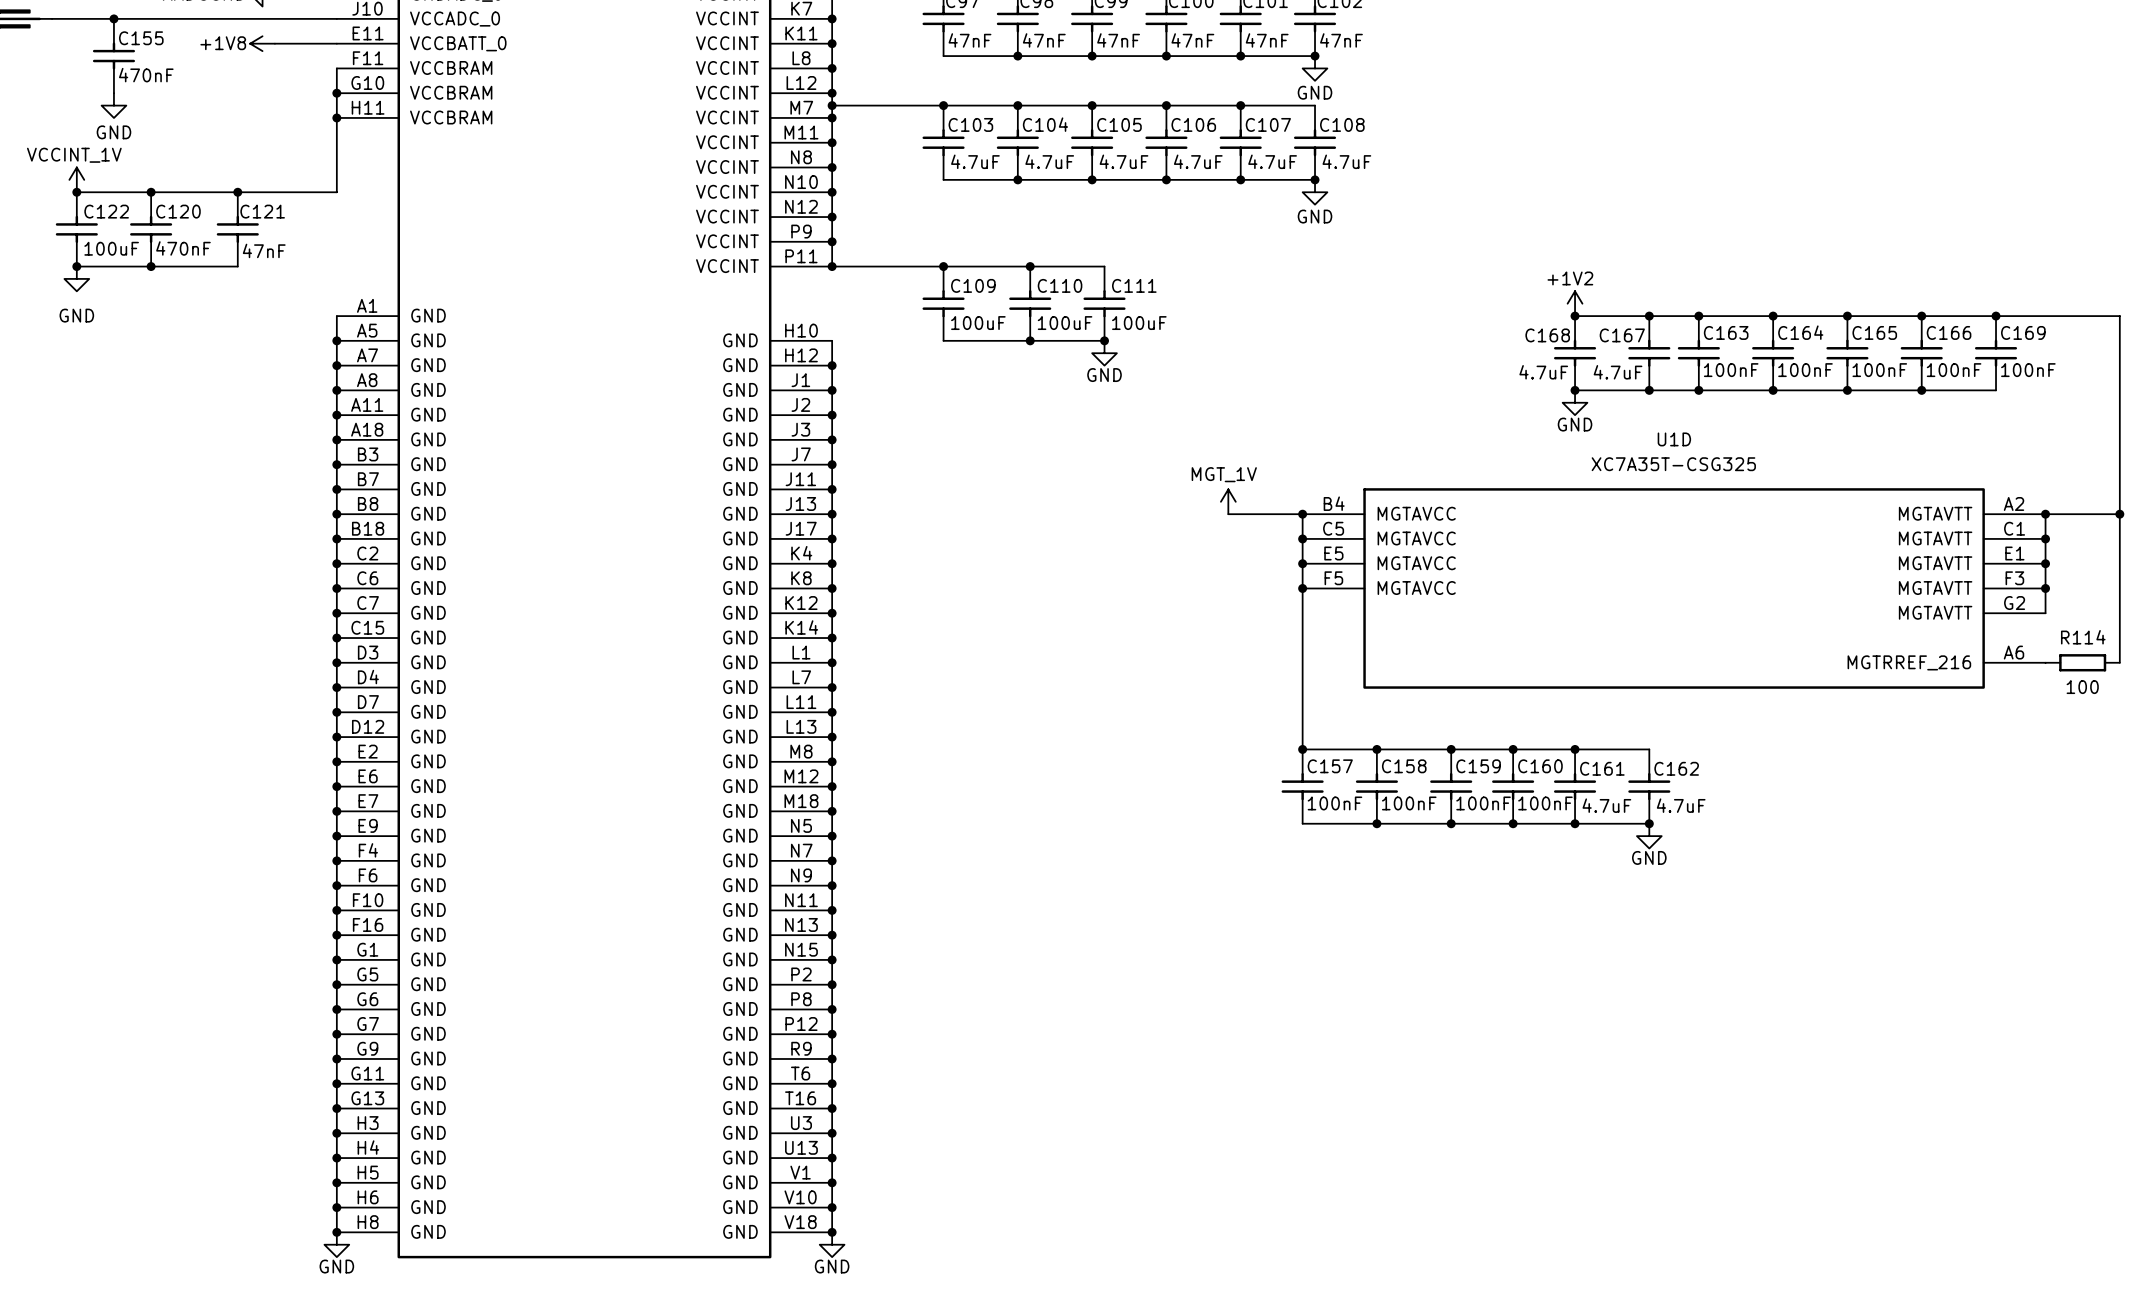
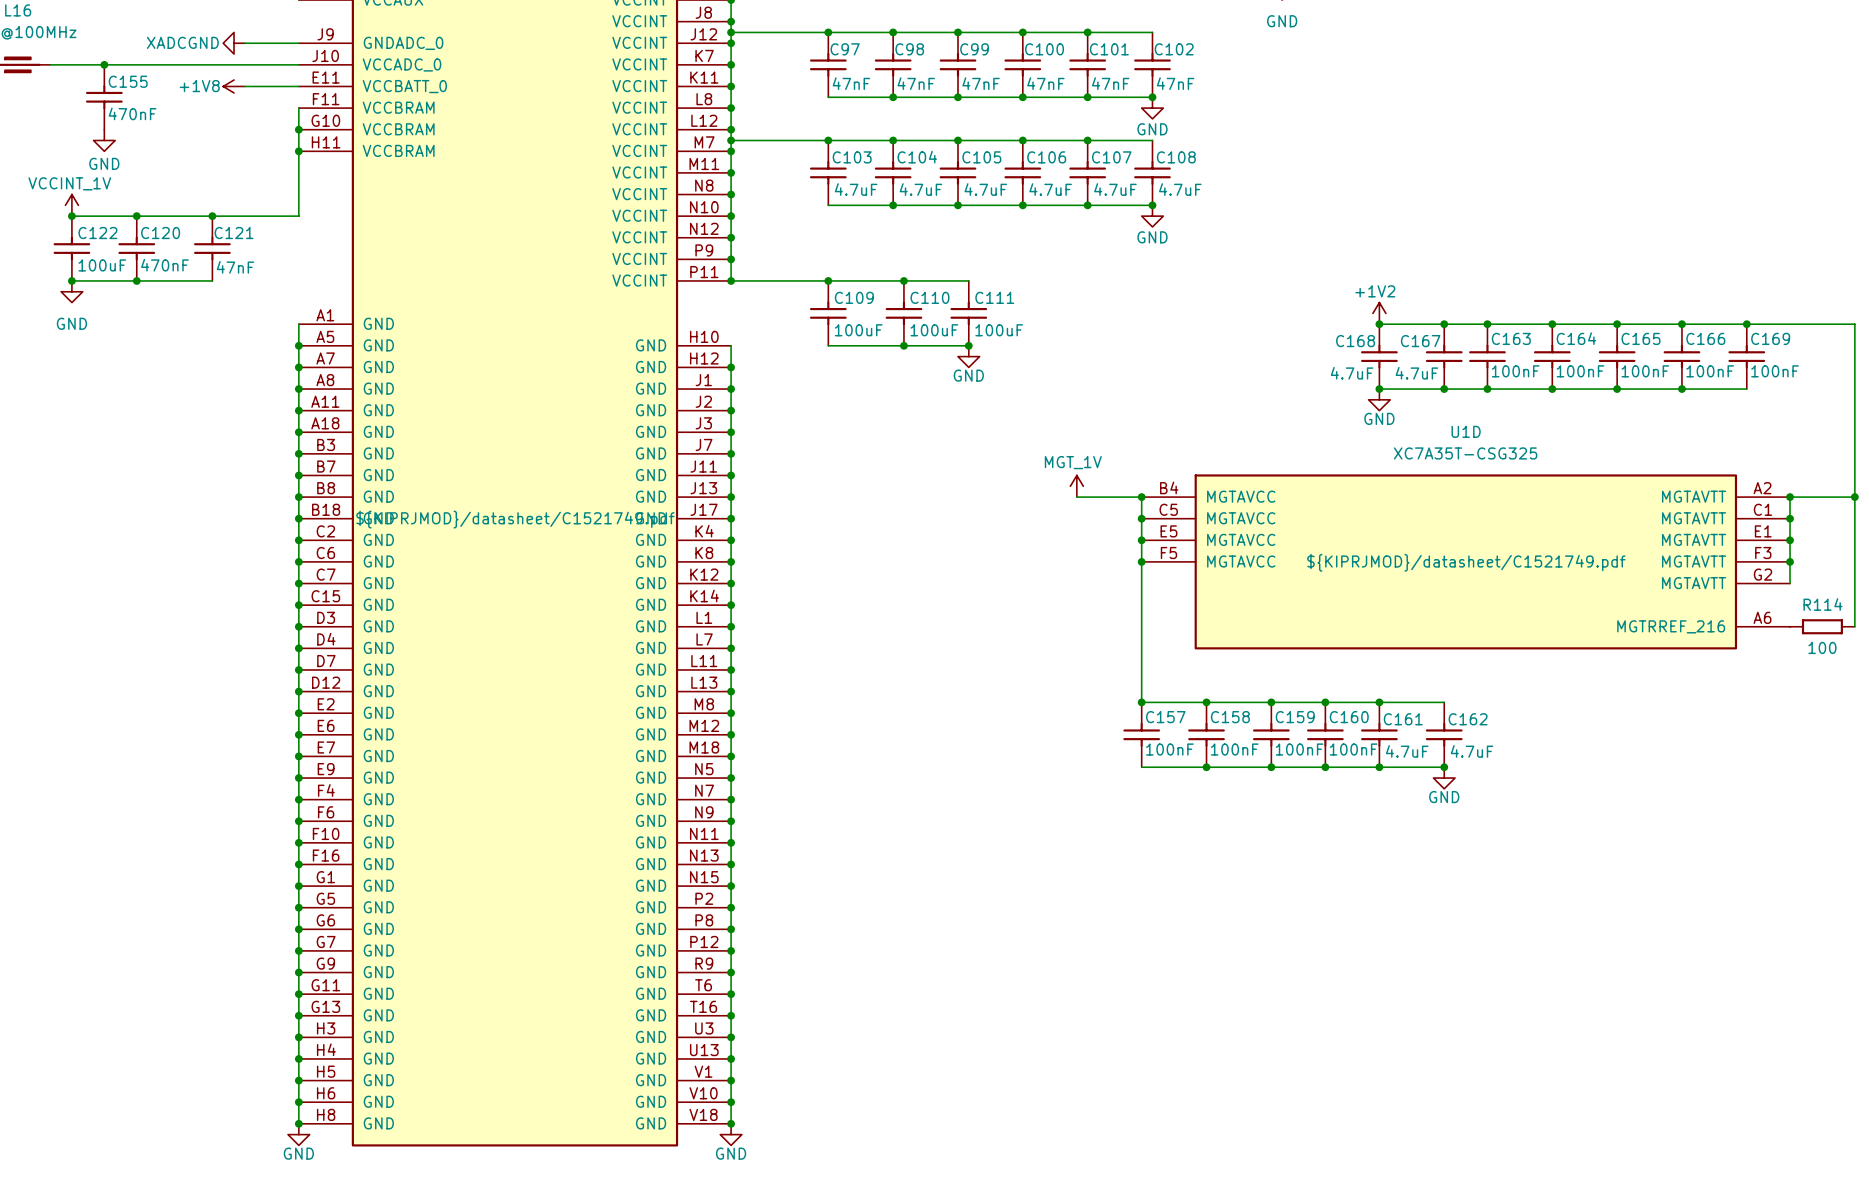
part text: none -> ${KIPRJMOD}/datasheet/C1521749.pdf (515, 519)
U1D text: none -> ${KIPRJMOD}/datasheet/C1521749.pdf (1466, 562)

